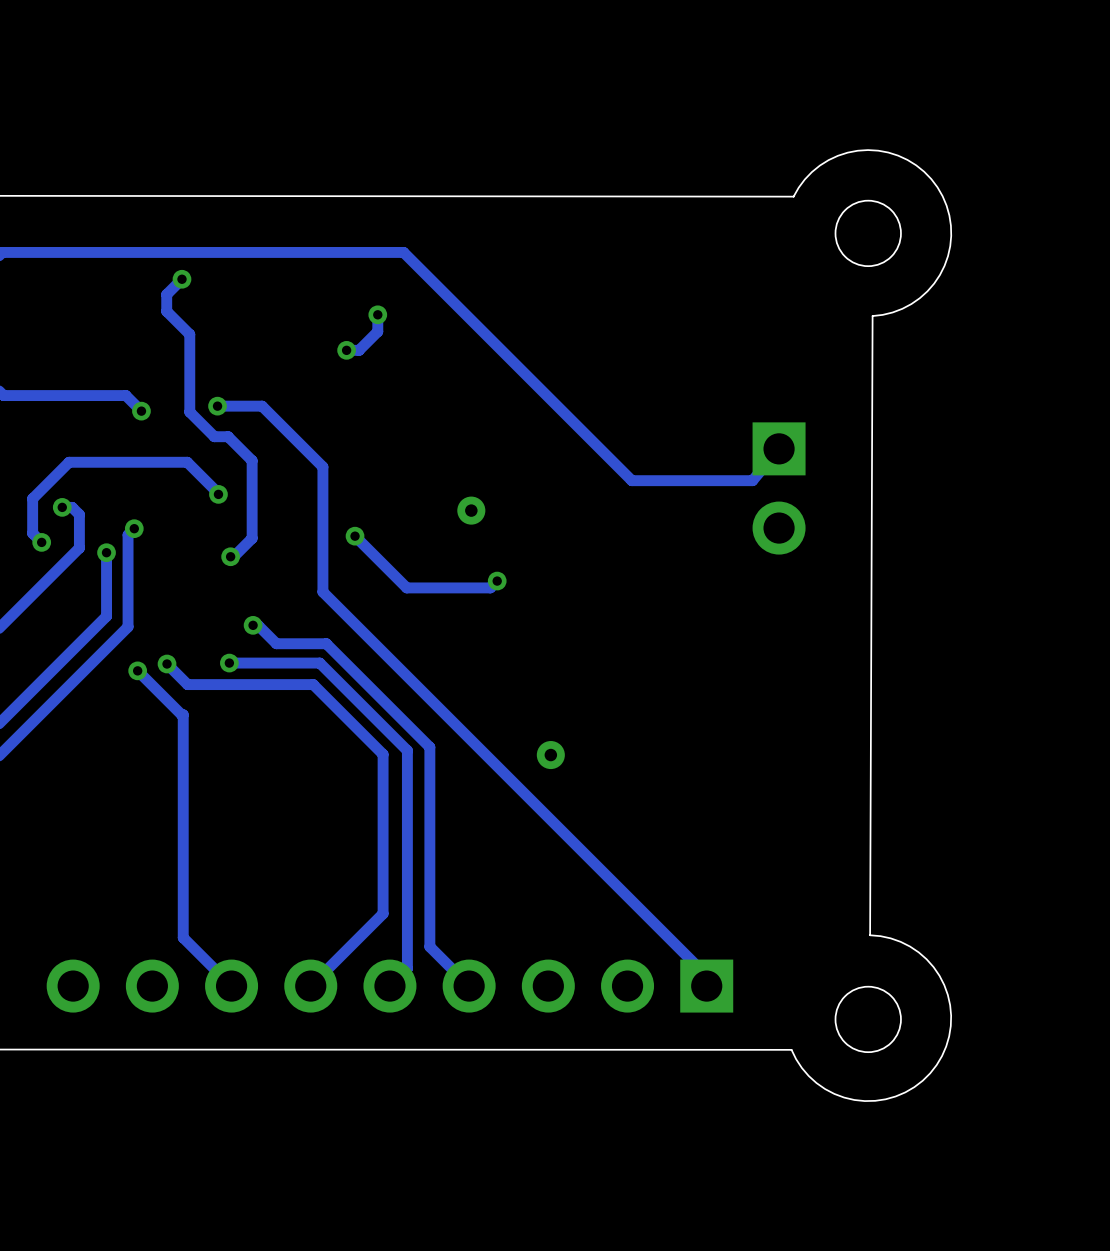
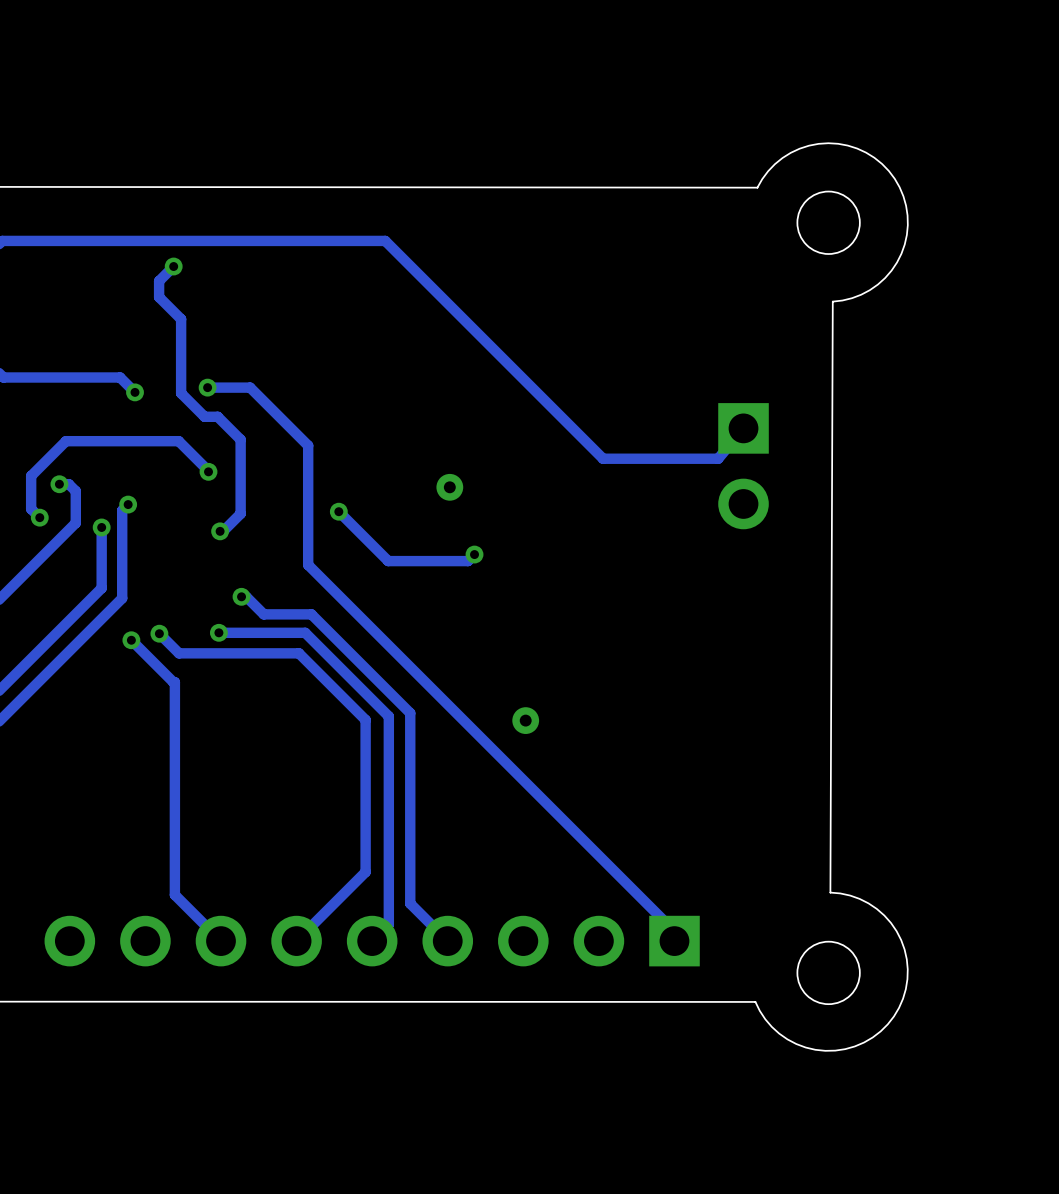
track: (377, 314) (377, 331) (359, 350) (346, 350) -> none
via: (377, 314) -> none
via: (346, 350) -> none

